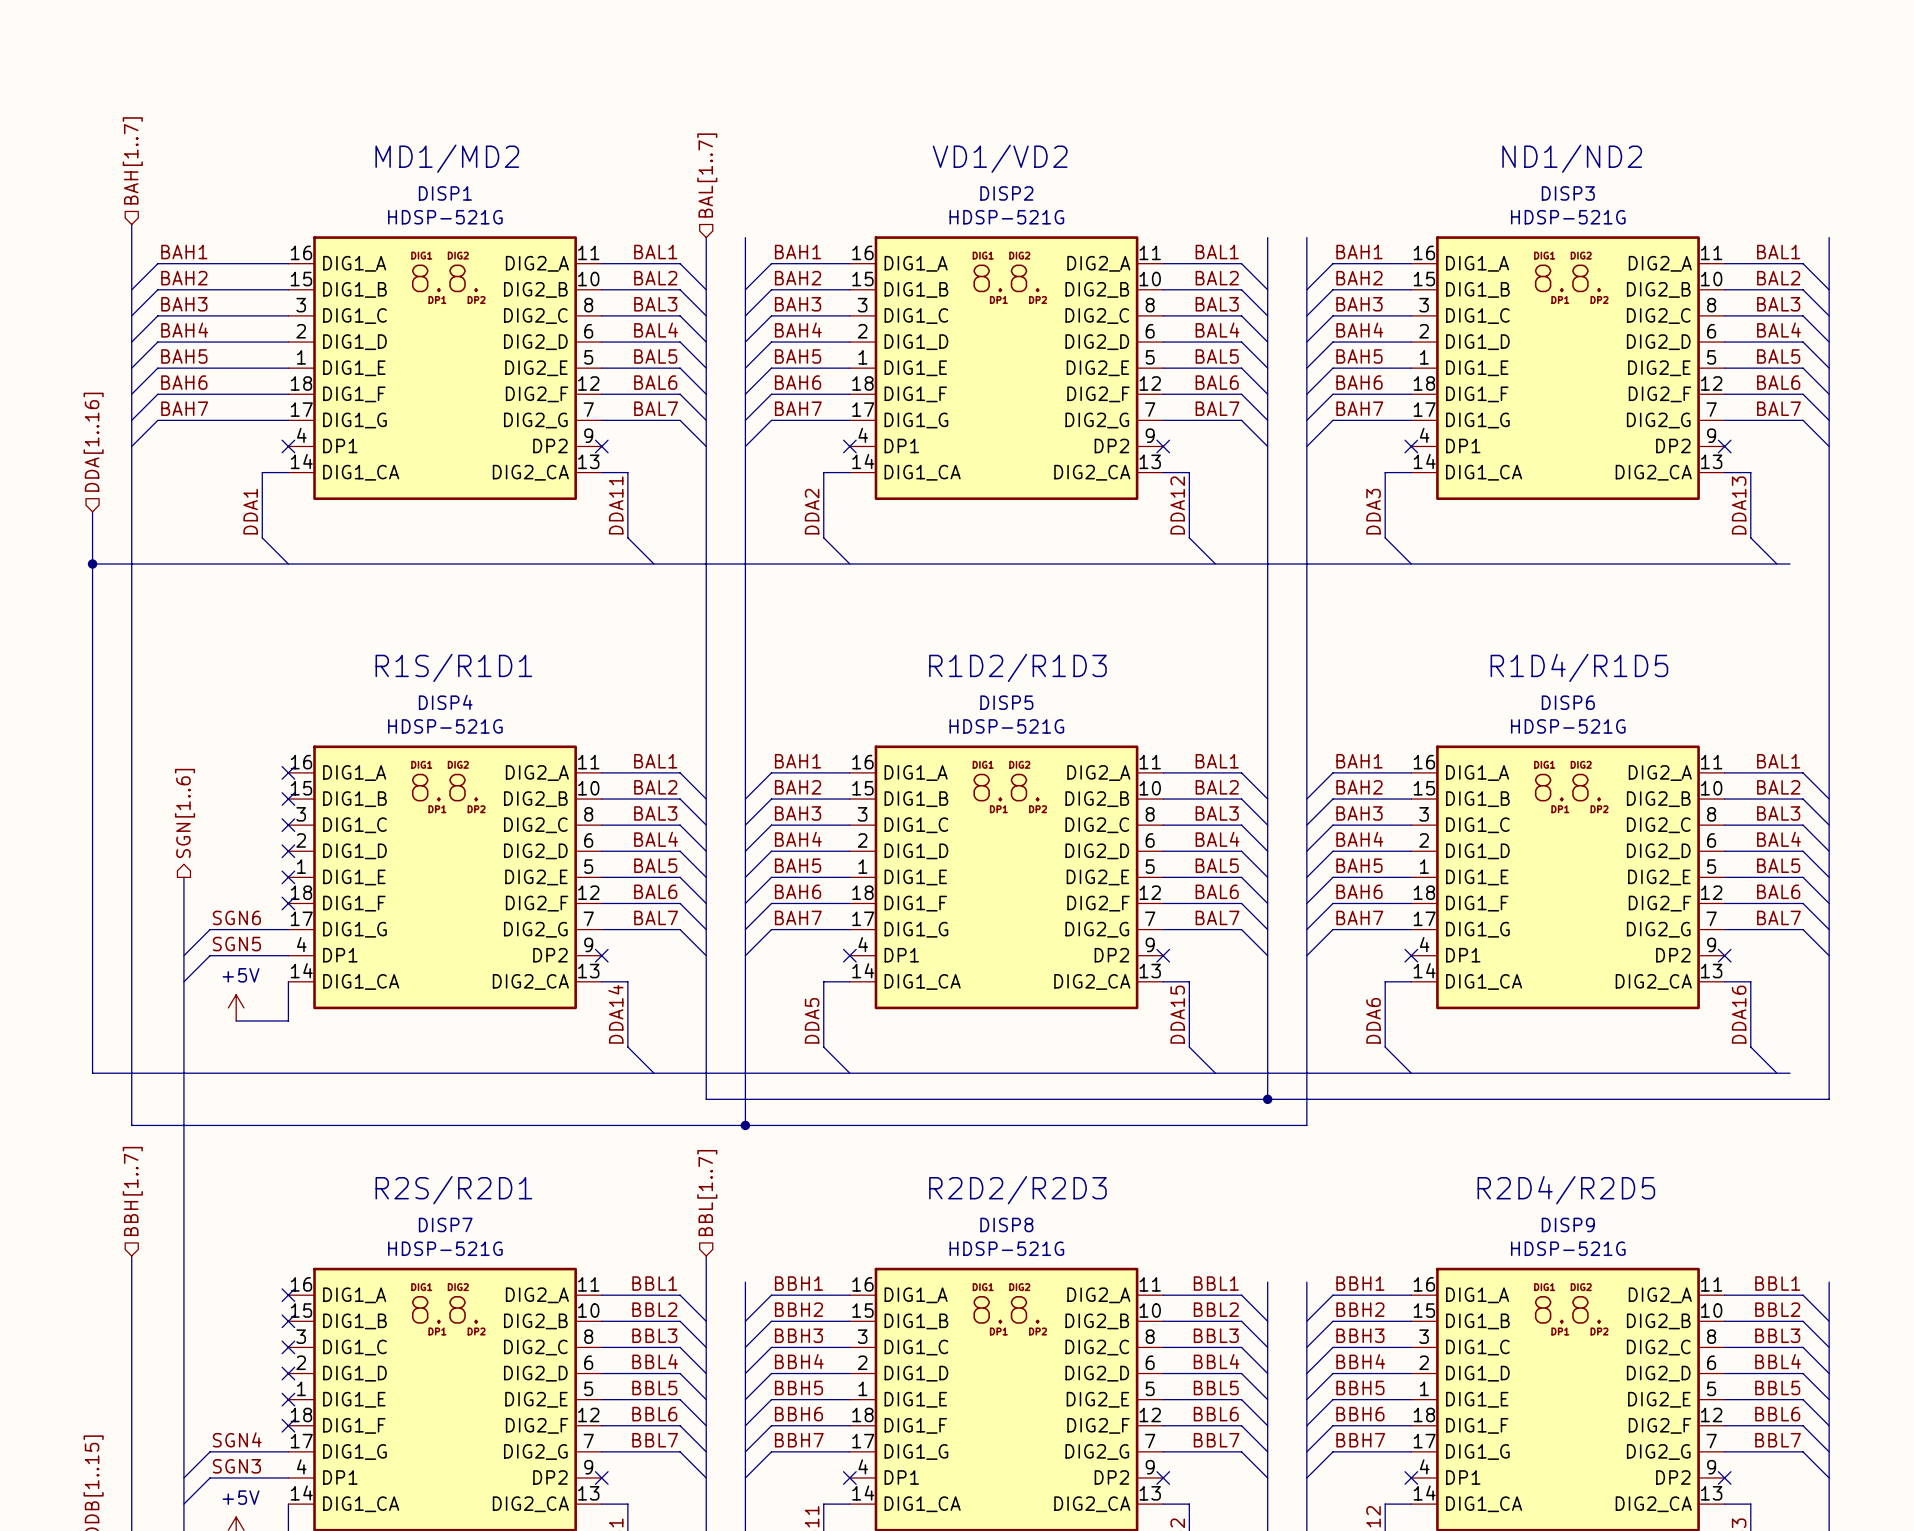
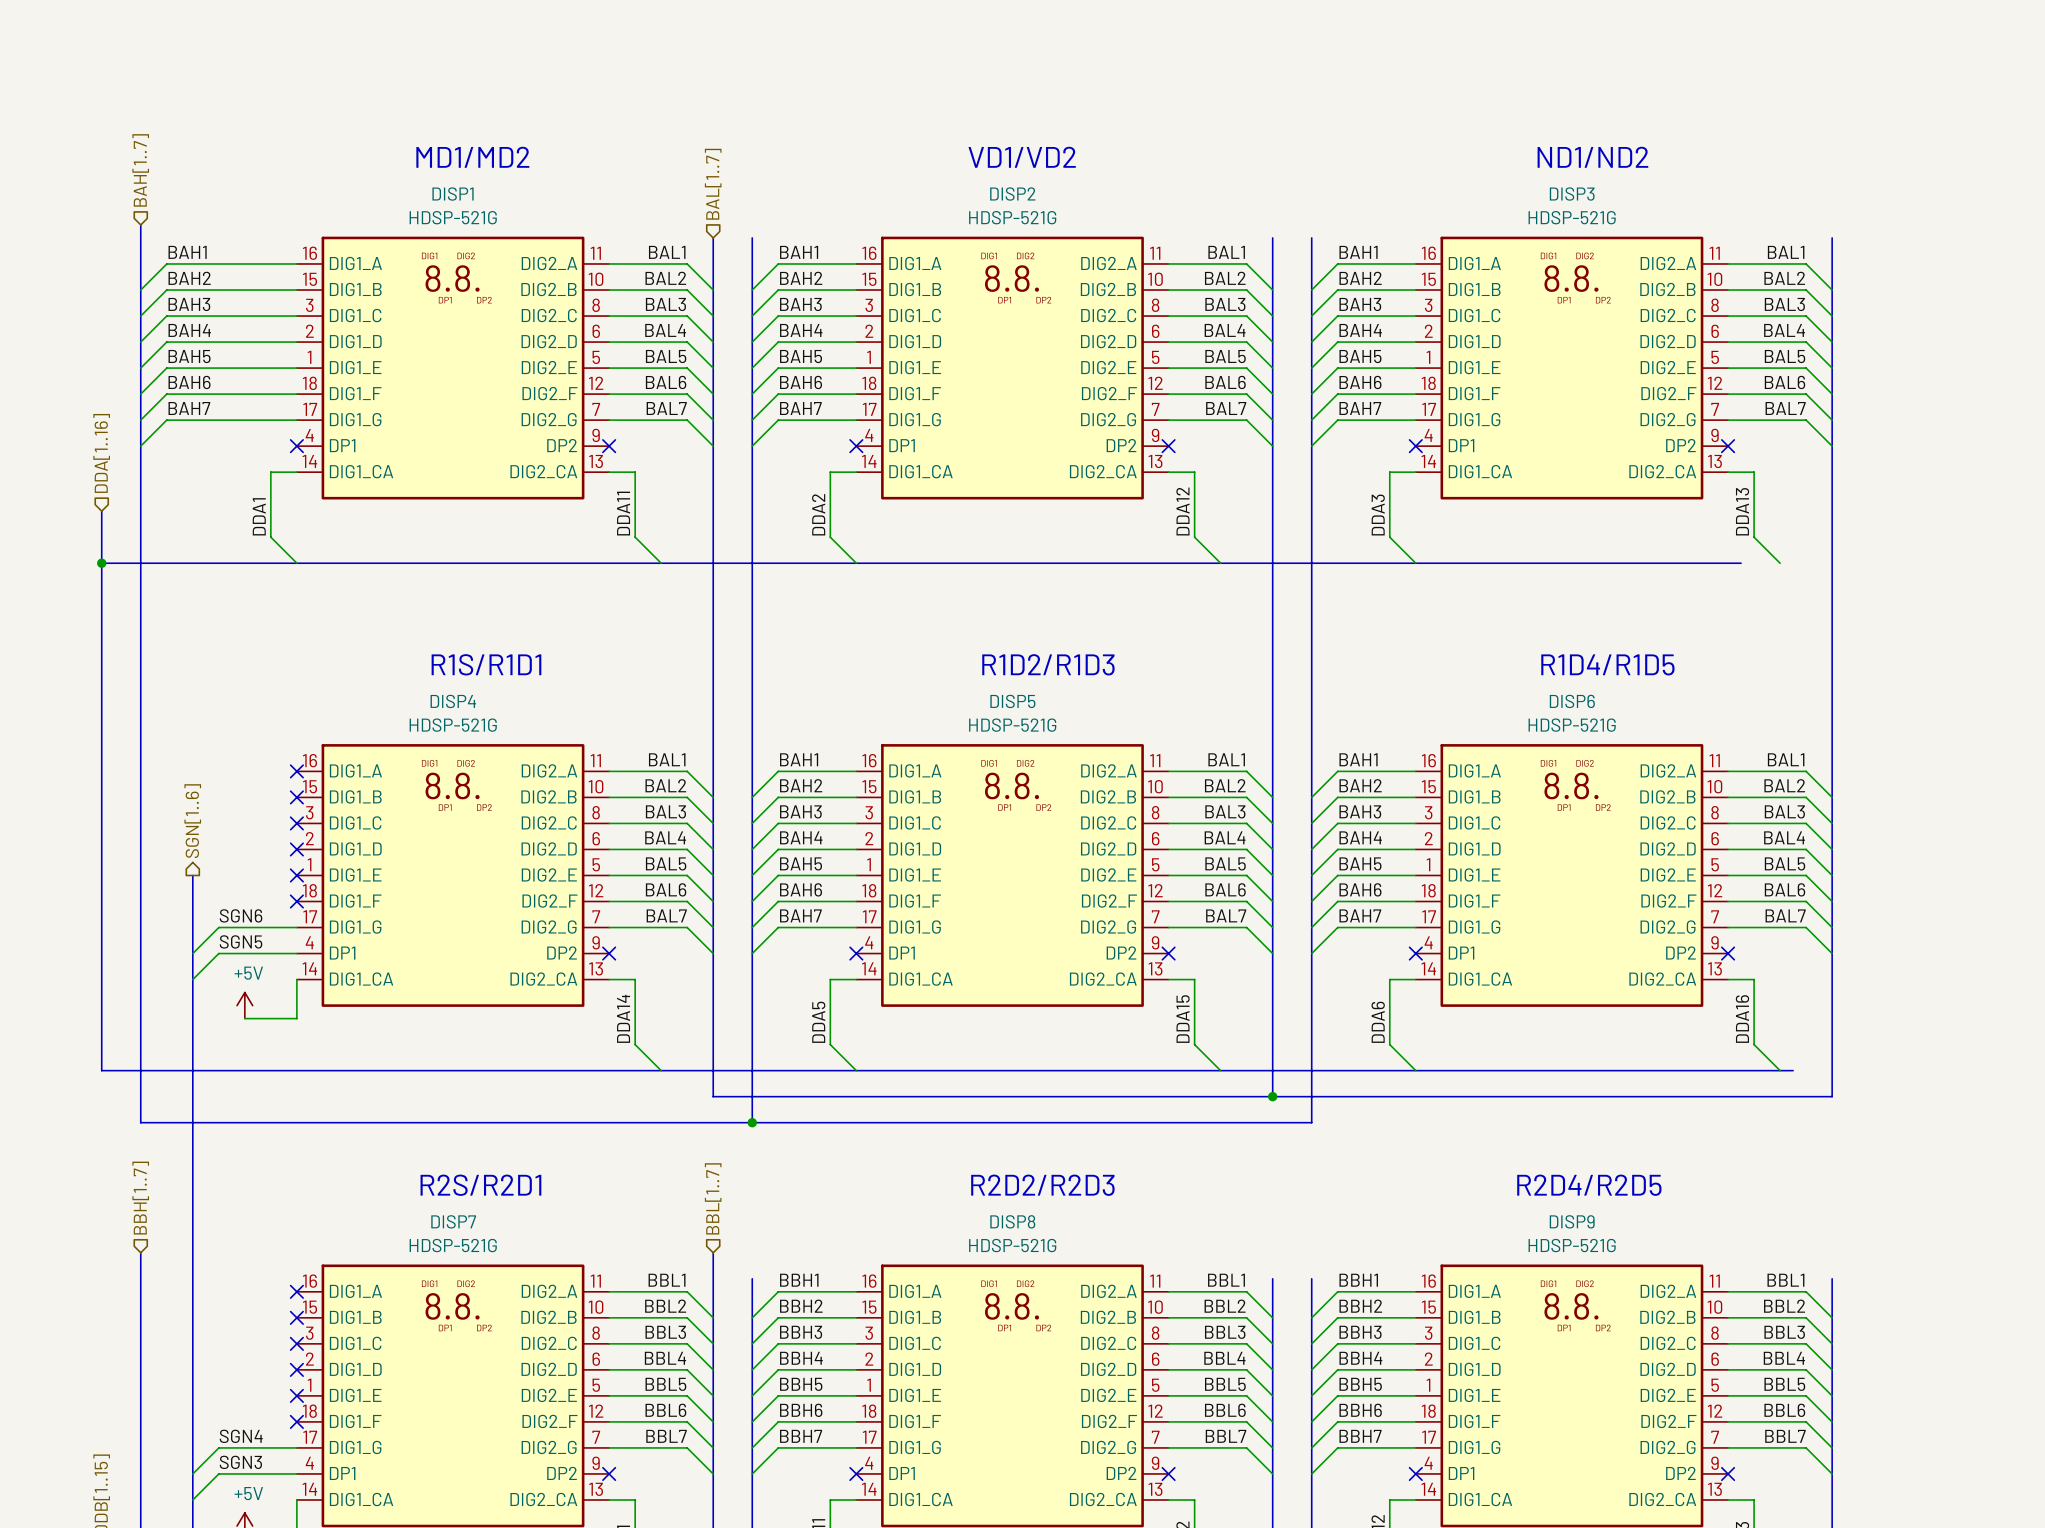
bus: (1737, 563) (1789, 563) -> none

